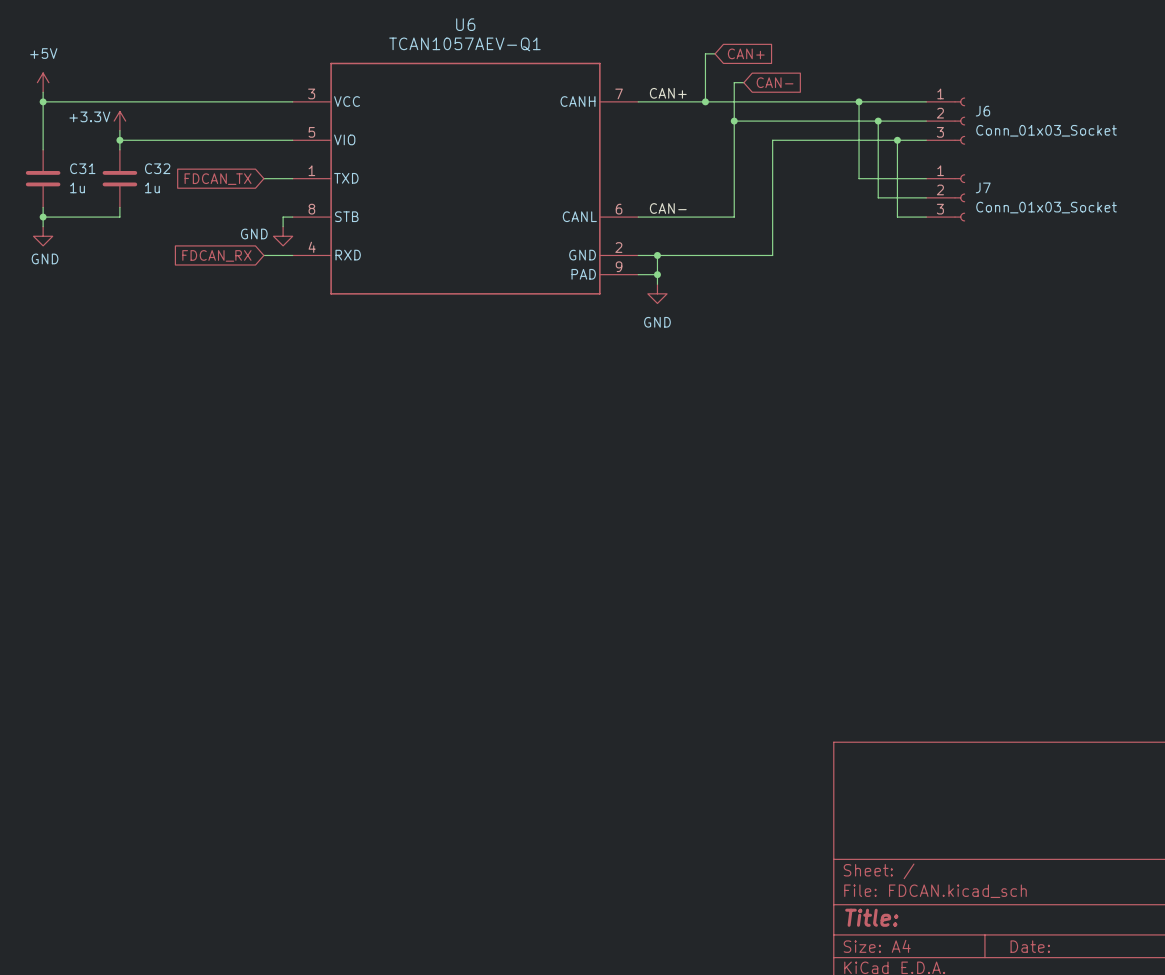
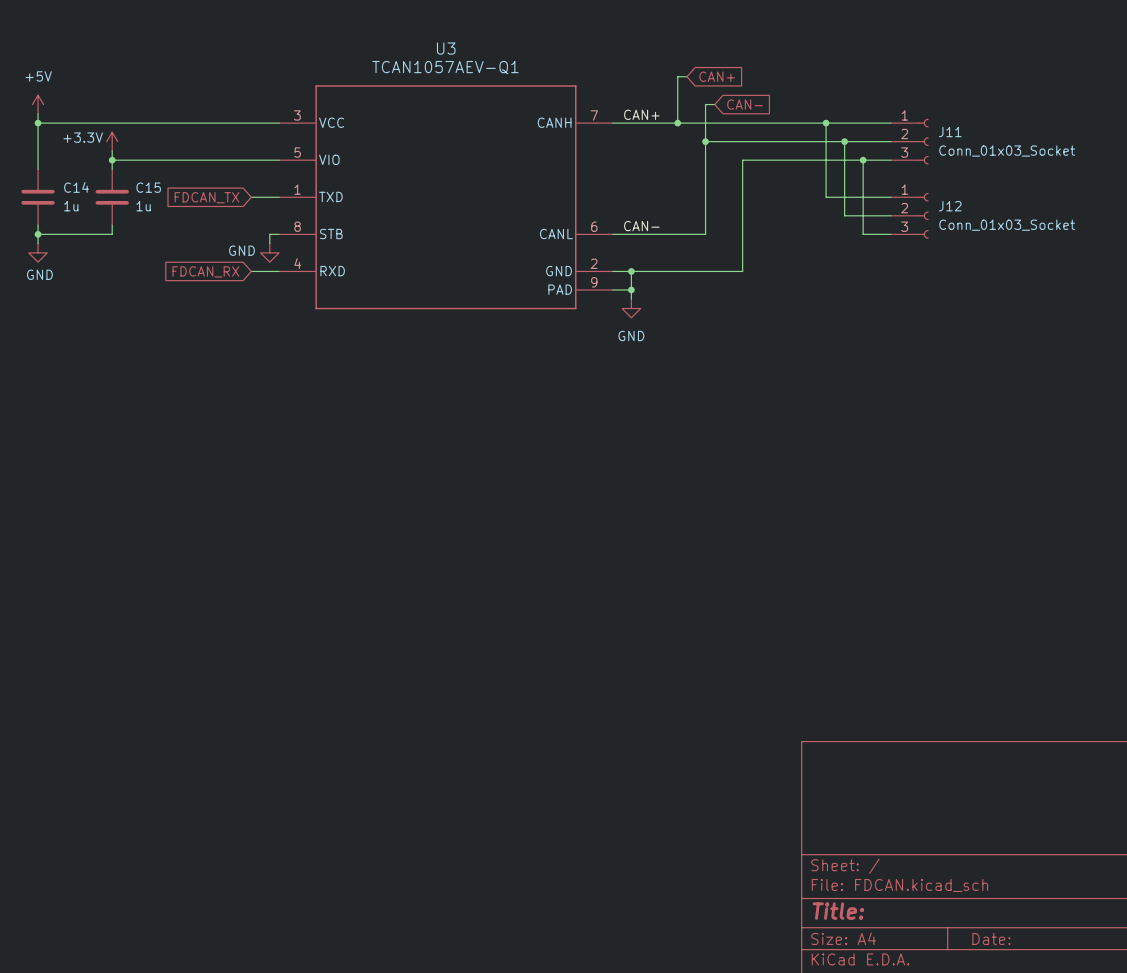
U6 name: U6 (465, 24) -> U3 (446, 48)
J6 name: J6 (982, 111) -> J11 (950, 132)
C31 name: C31 (82, 168) -> C14 (76, 187)
C32 name: C32 (157, 168) -> C15 (148, 187)
J7 name: J7 (983, 187) -> J12 (950, 206)

